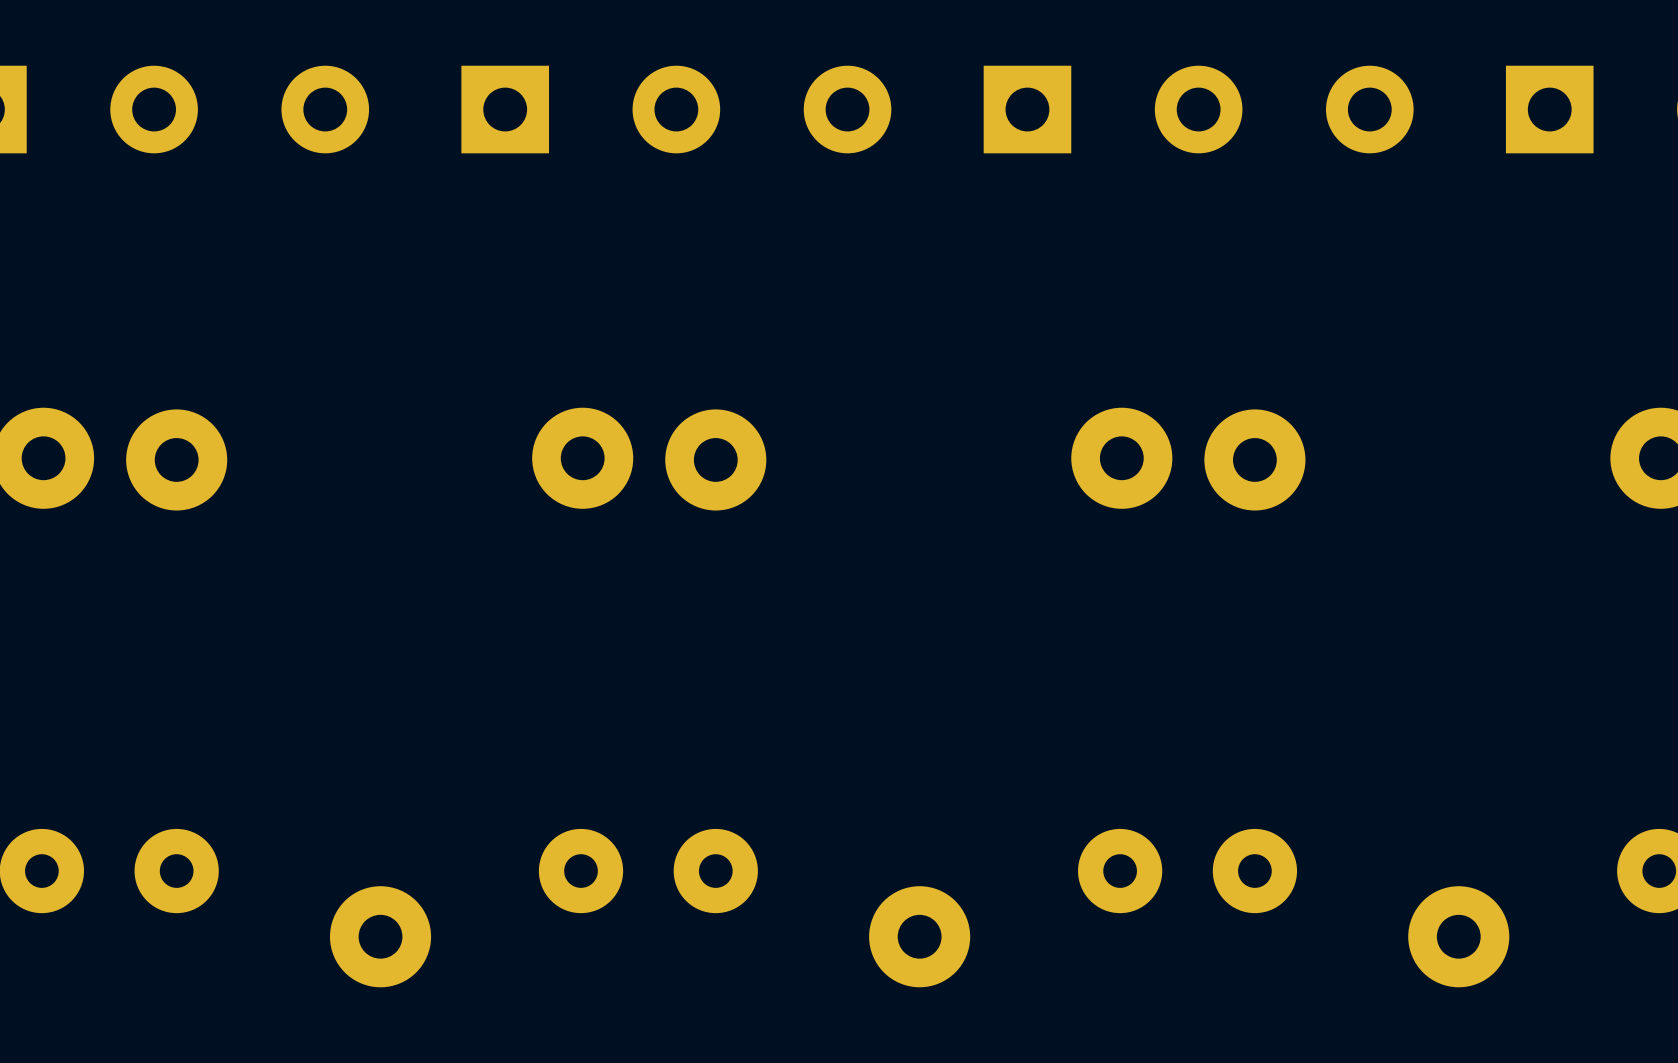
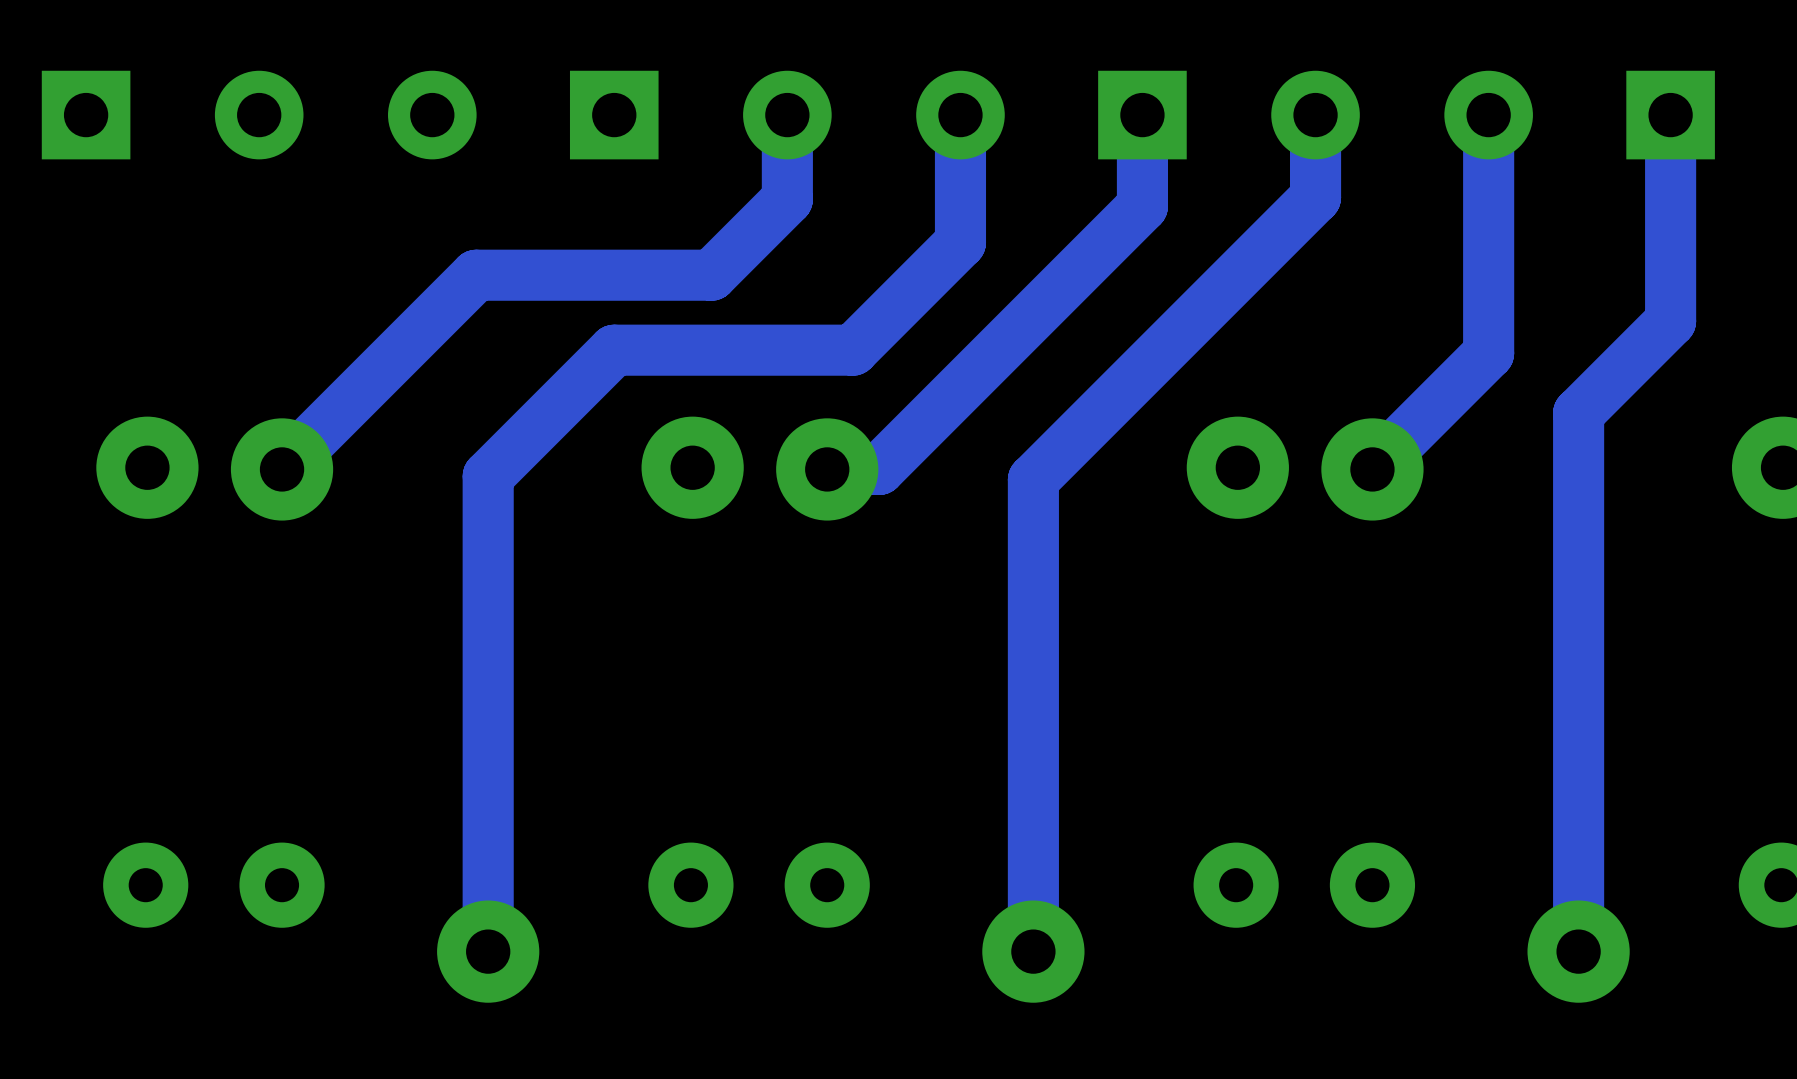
track: none -> (787, 115) (787, 199) (711, 275) (476, 275) (282, 469)
track: none -> (960, 115) (960, 242) (852, 350) (614, 350) (488, 476) (488, 951)
track: none -> (1142, 115) (1142, 206) (879, 469) (827, 469)
track: none -> (1315, 115) (1315, 197) (1033, 479) (1033, 951)
track: none -> (1488, 115) (1488, 353) (1372, 469)
track: none -> (1670, 115) (1670, 321) (1578, 413) (1578, 951)

